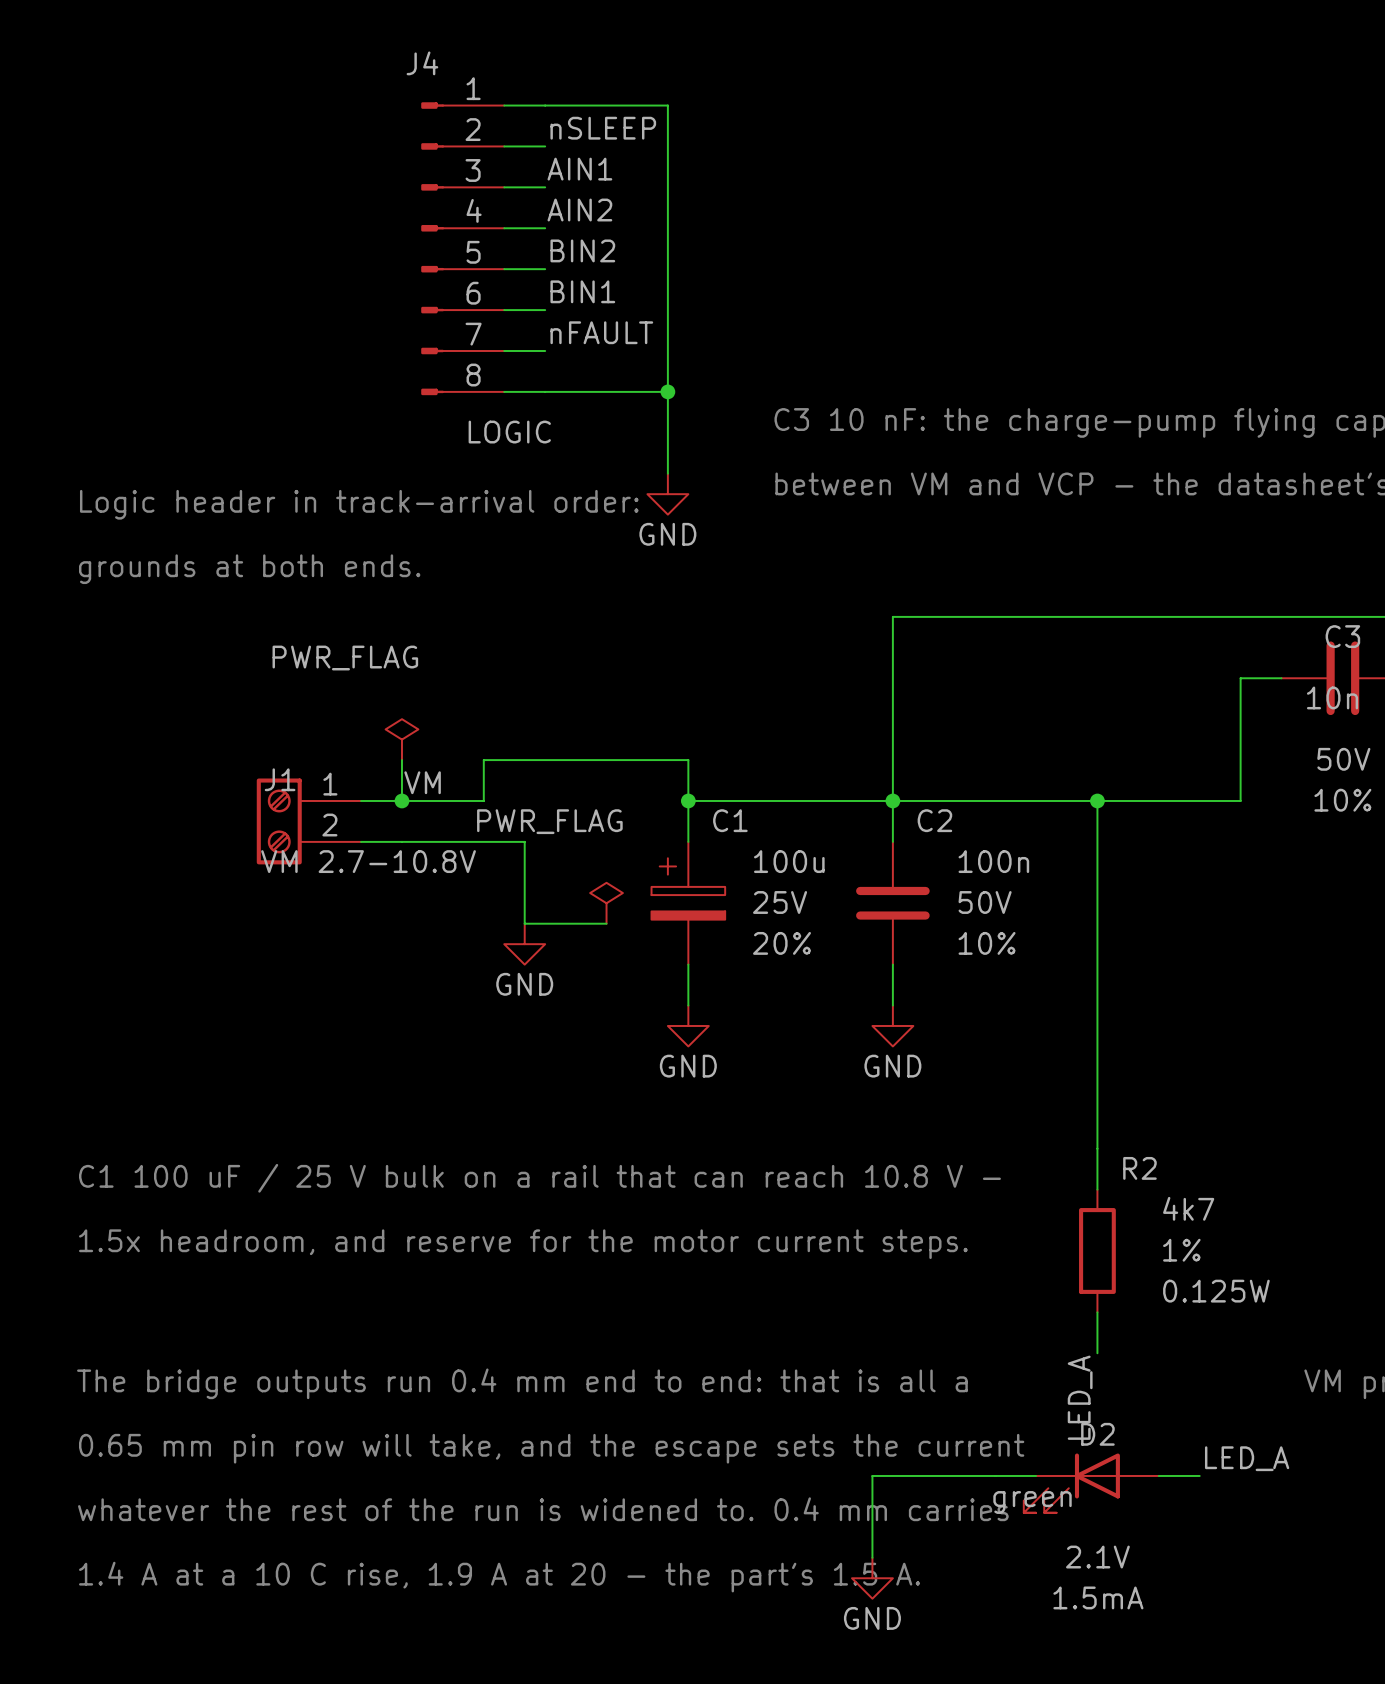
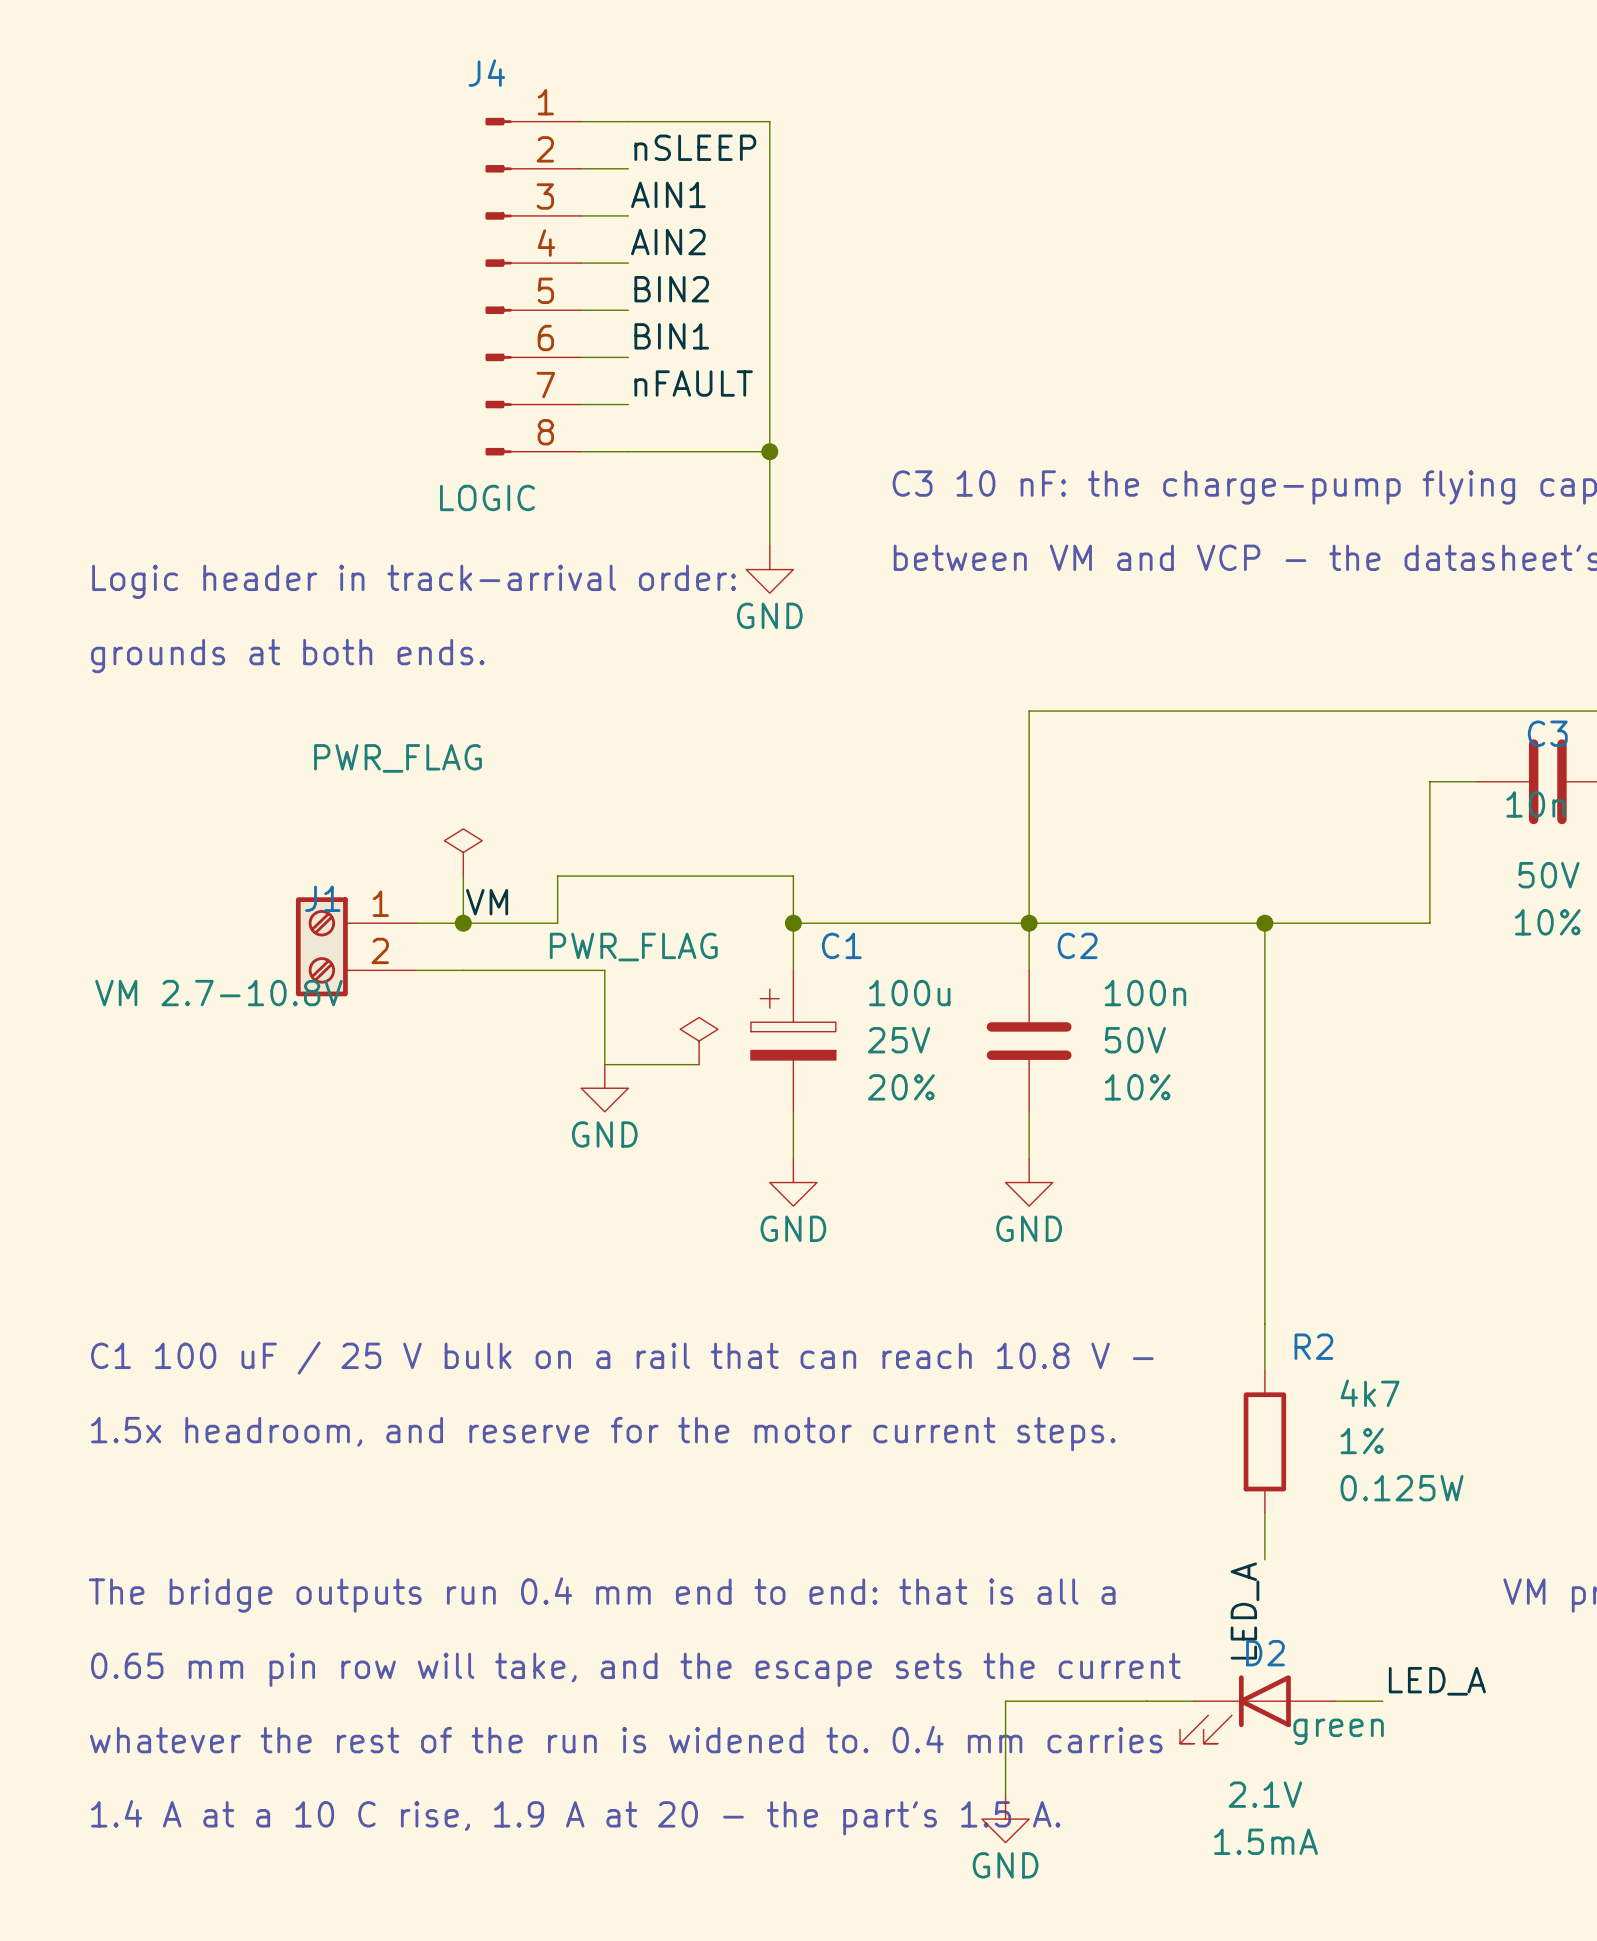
J4 value position: LOGIC (509, 432) -> LOGIC (487, 497)
J1 value position: VM 2.7-10.8V (368, 861) -> VM 2.7-10.8V (218, 993)
D2 value position: green (1032, 1502) -> green (1338, 1731)

